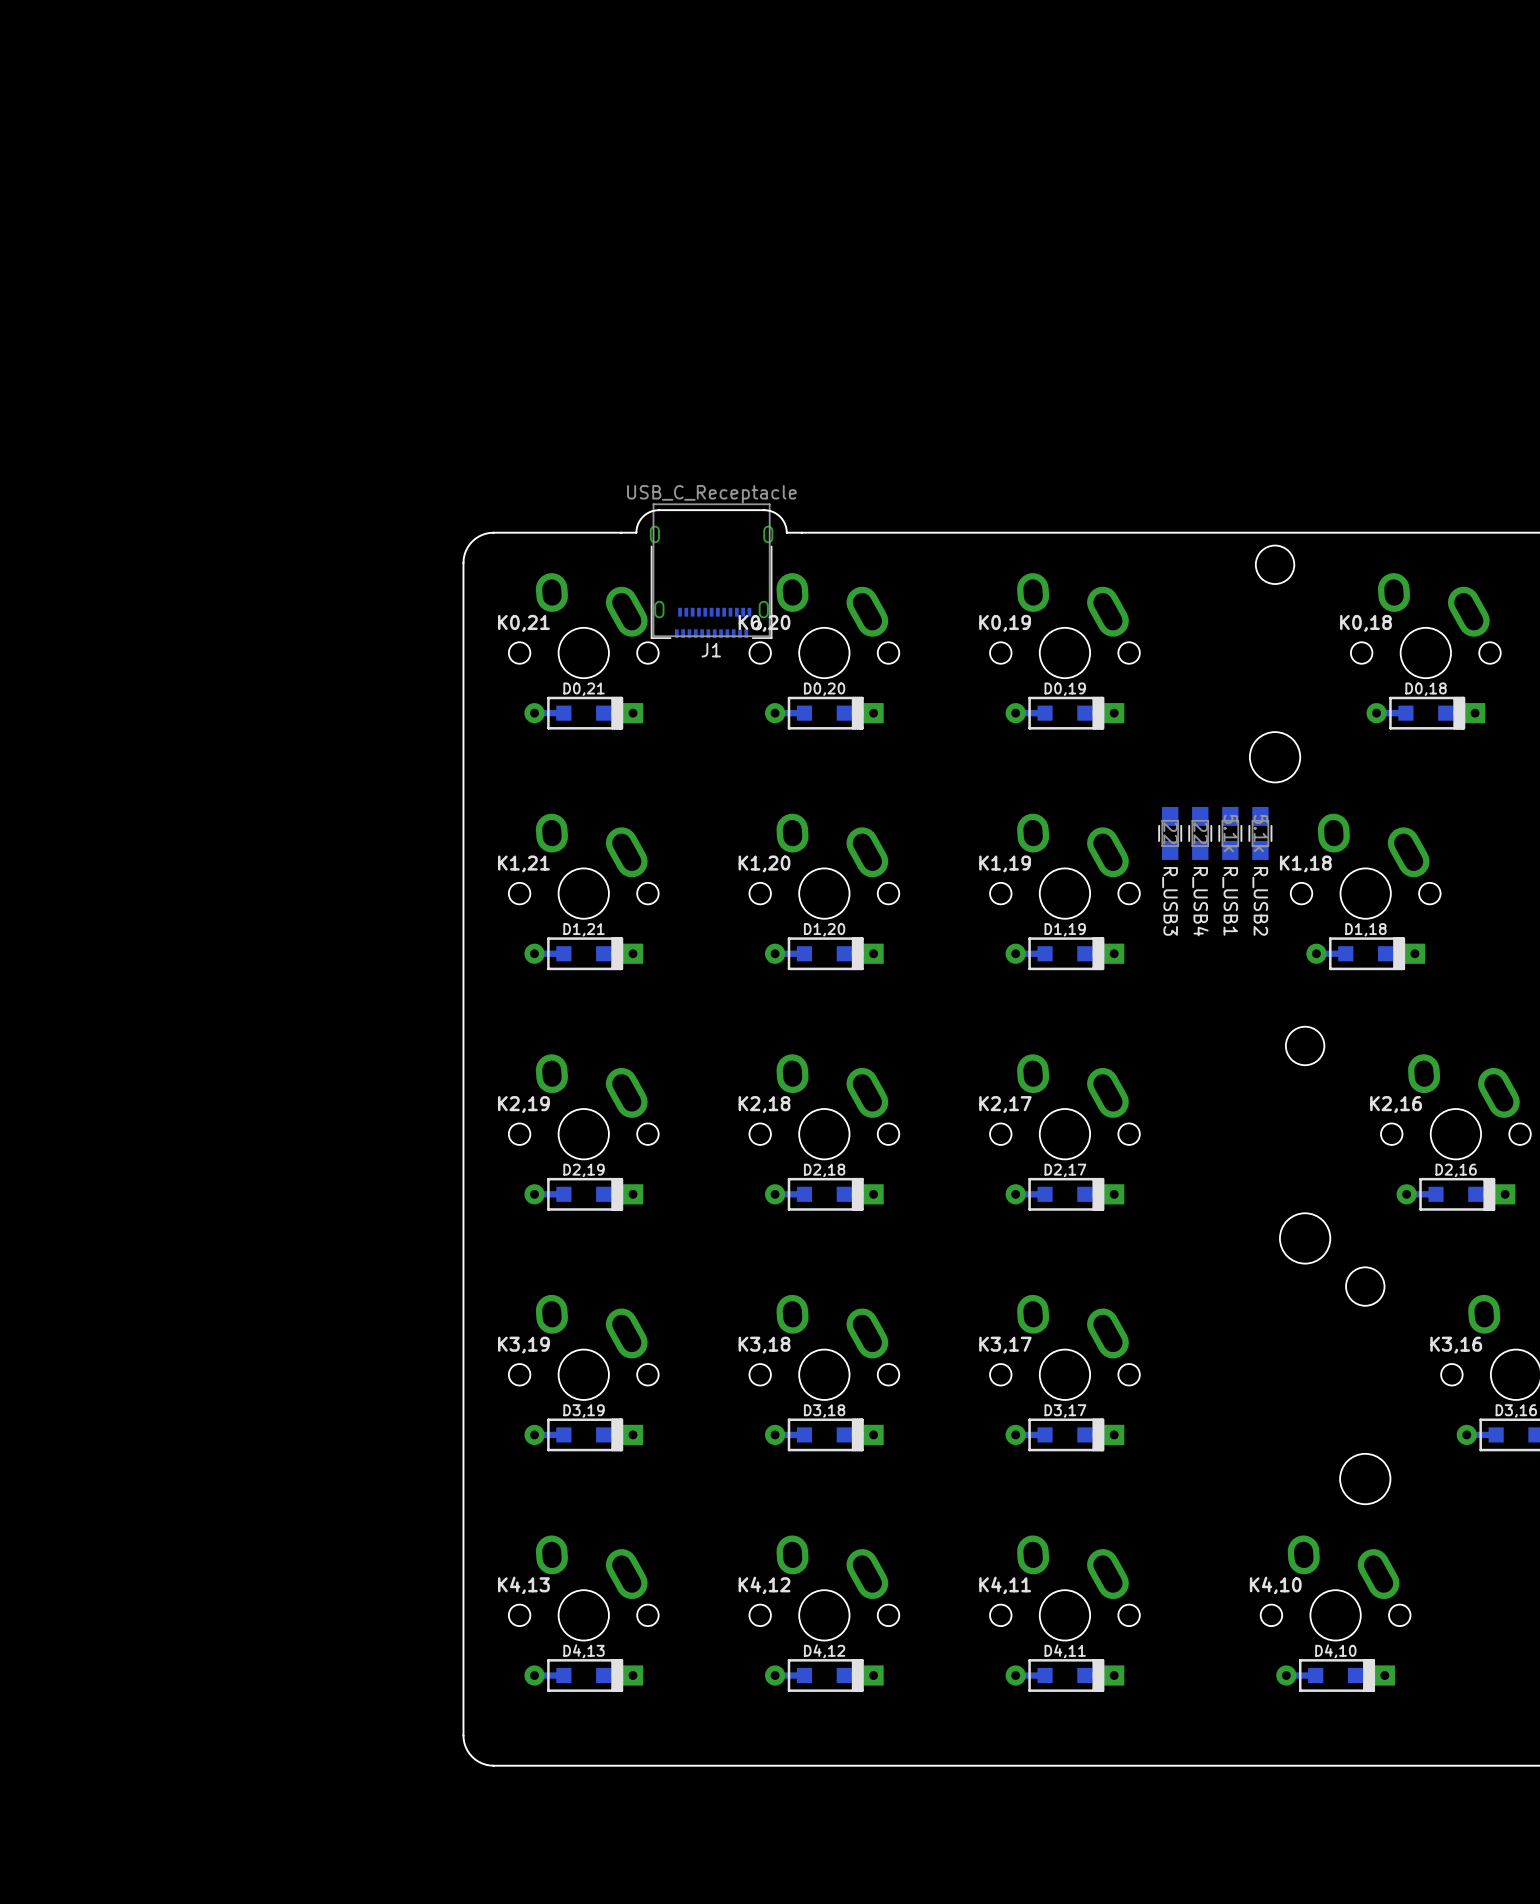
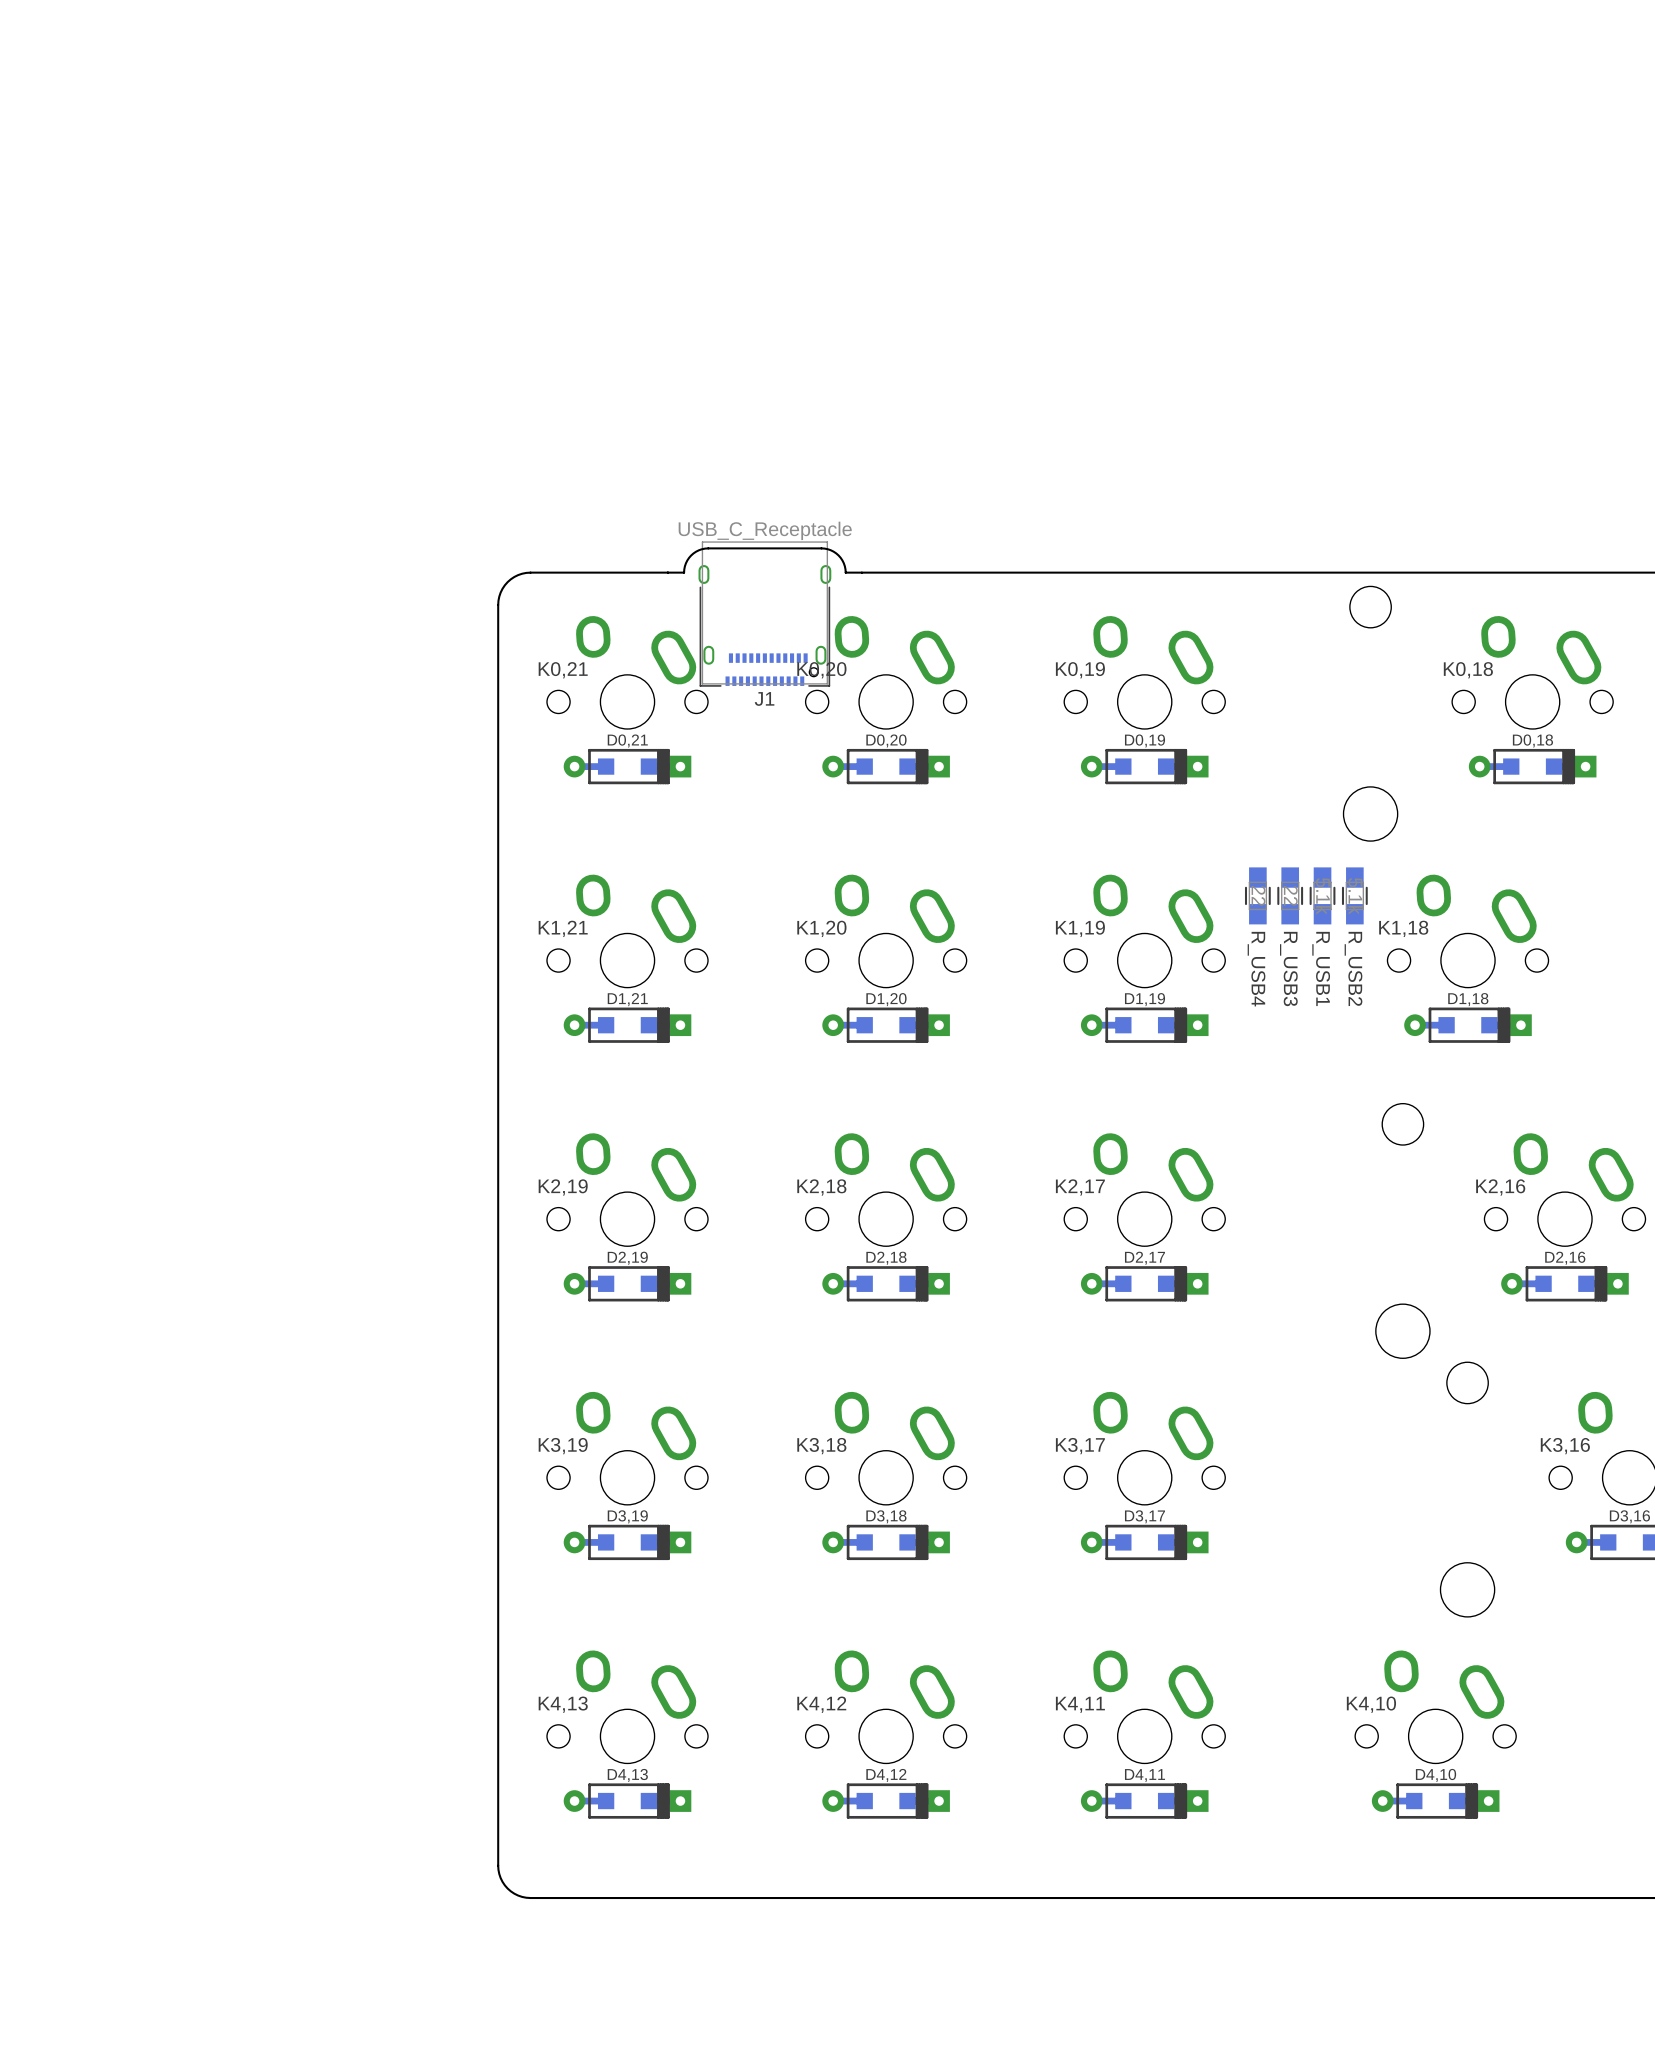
R_USB3 name: R_USB3 (1170, 901) -> R_USB4 (1256, 969)
R_USB4 name: R_USB4 (1200, 901) -> R_USB3 (1288, 969)

